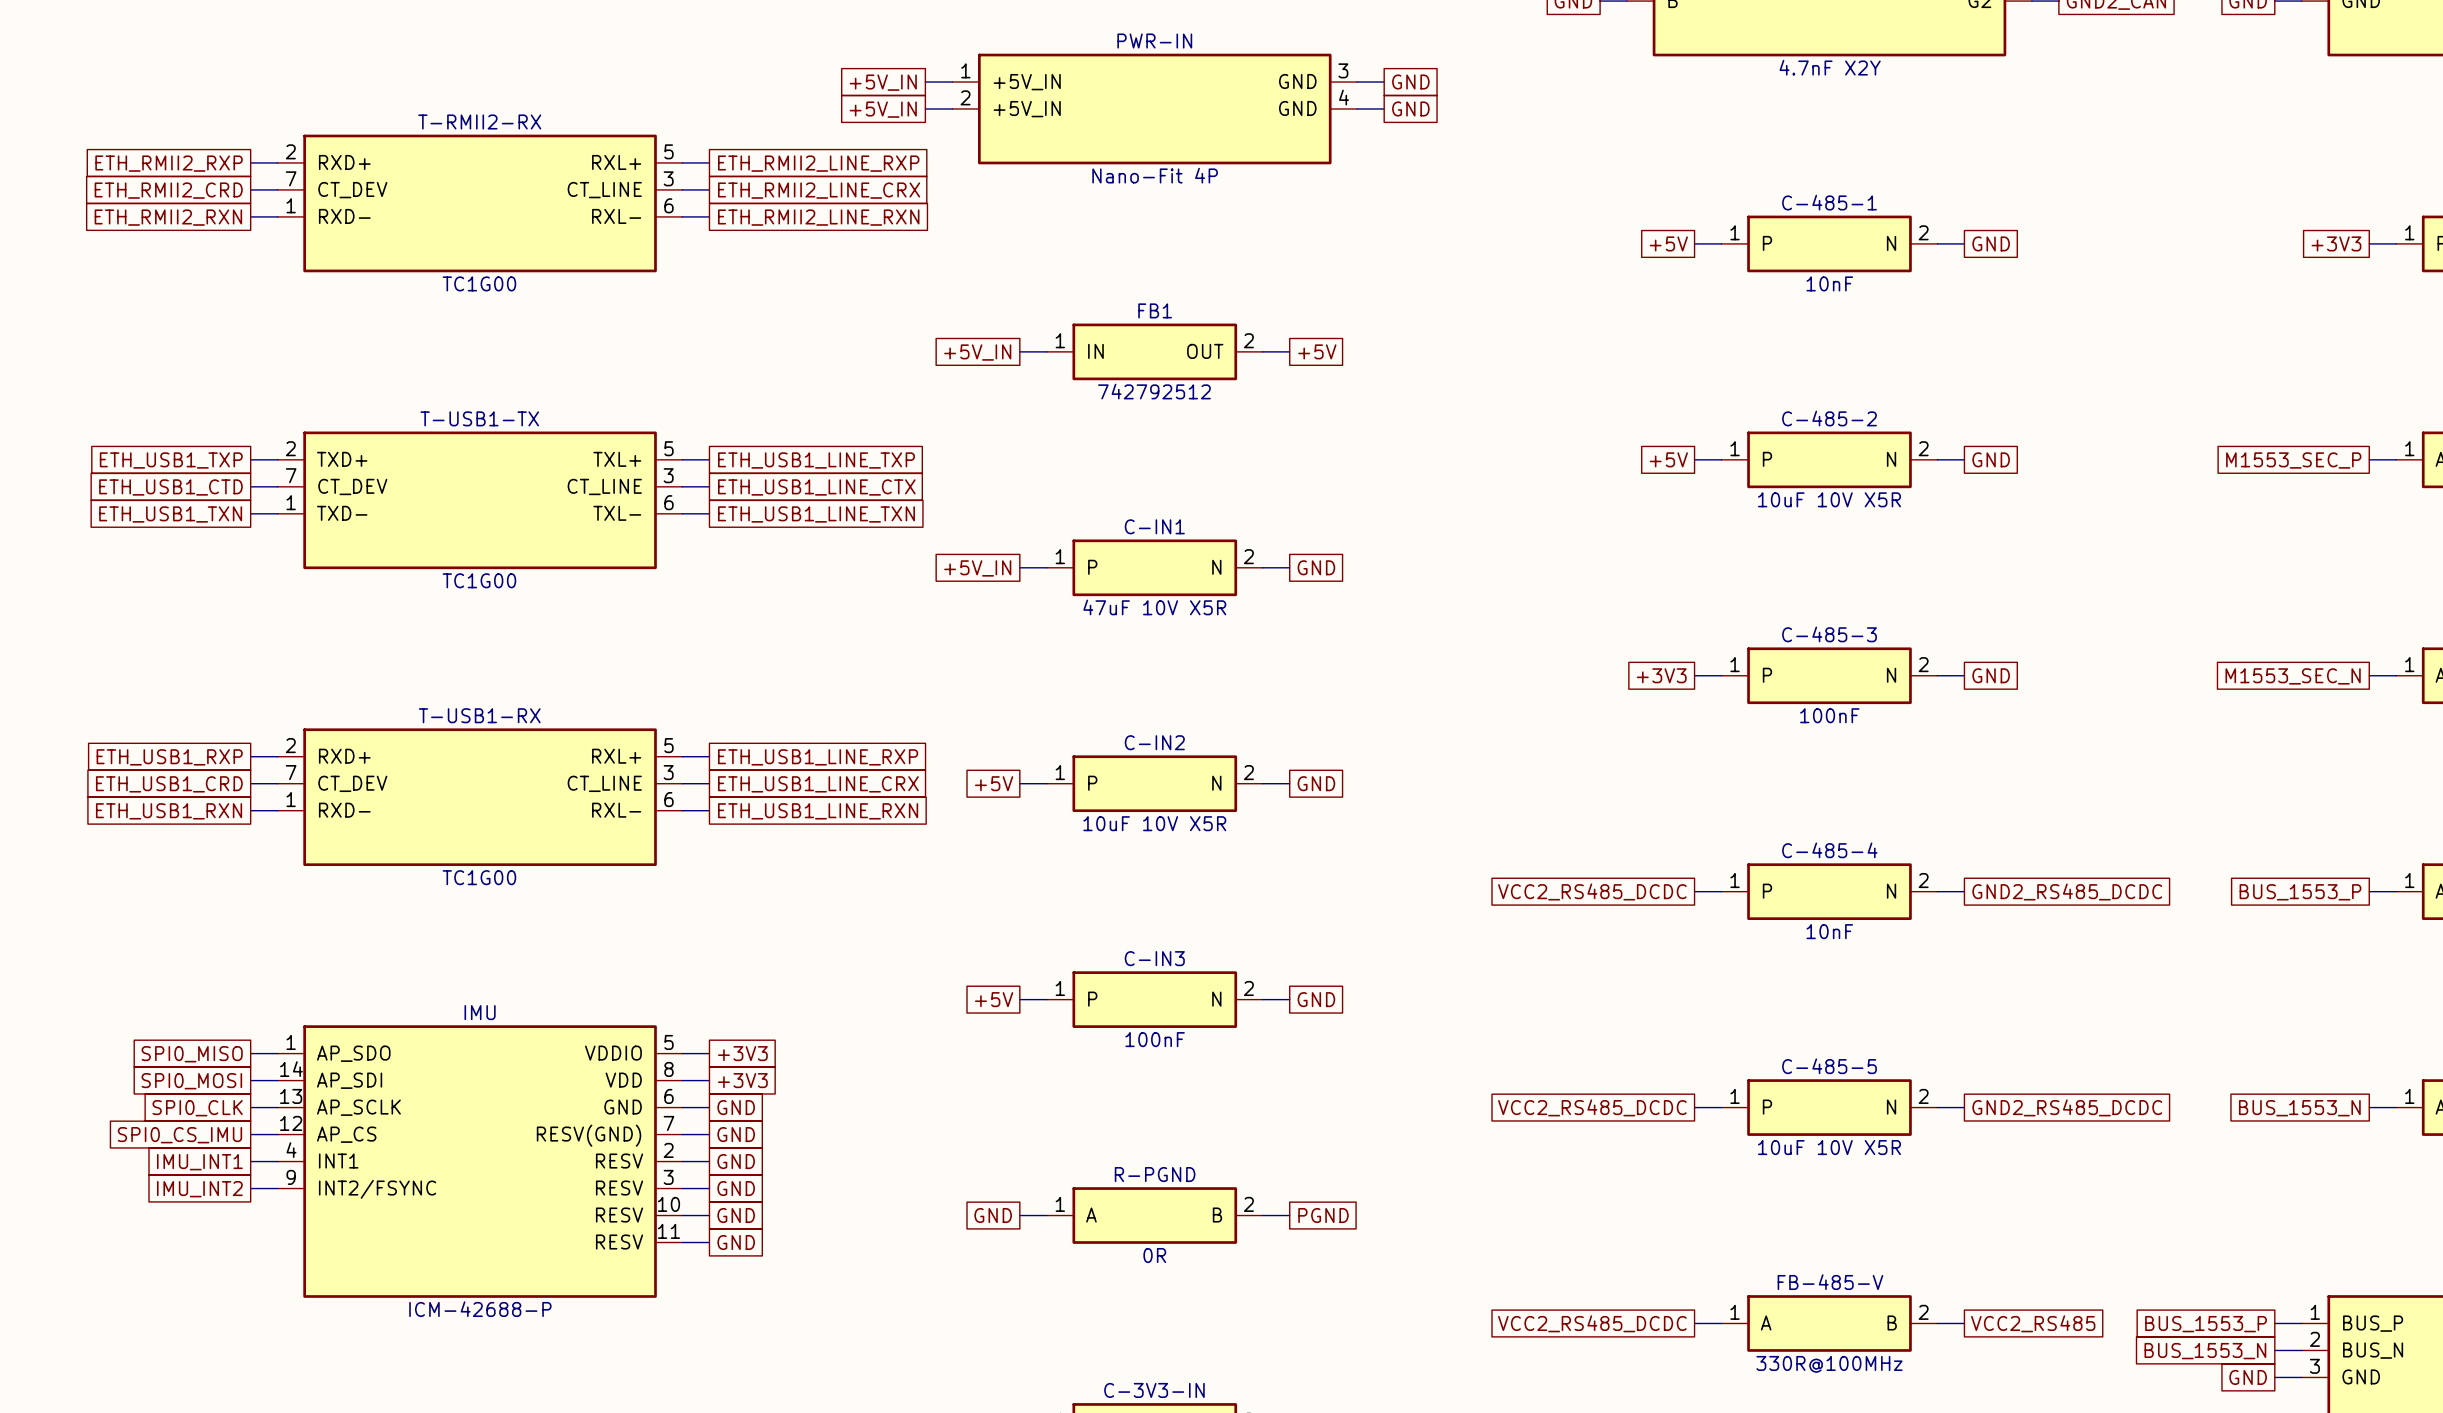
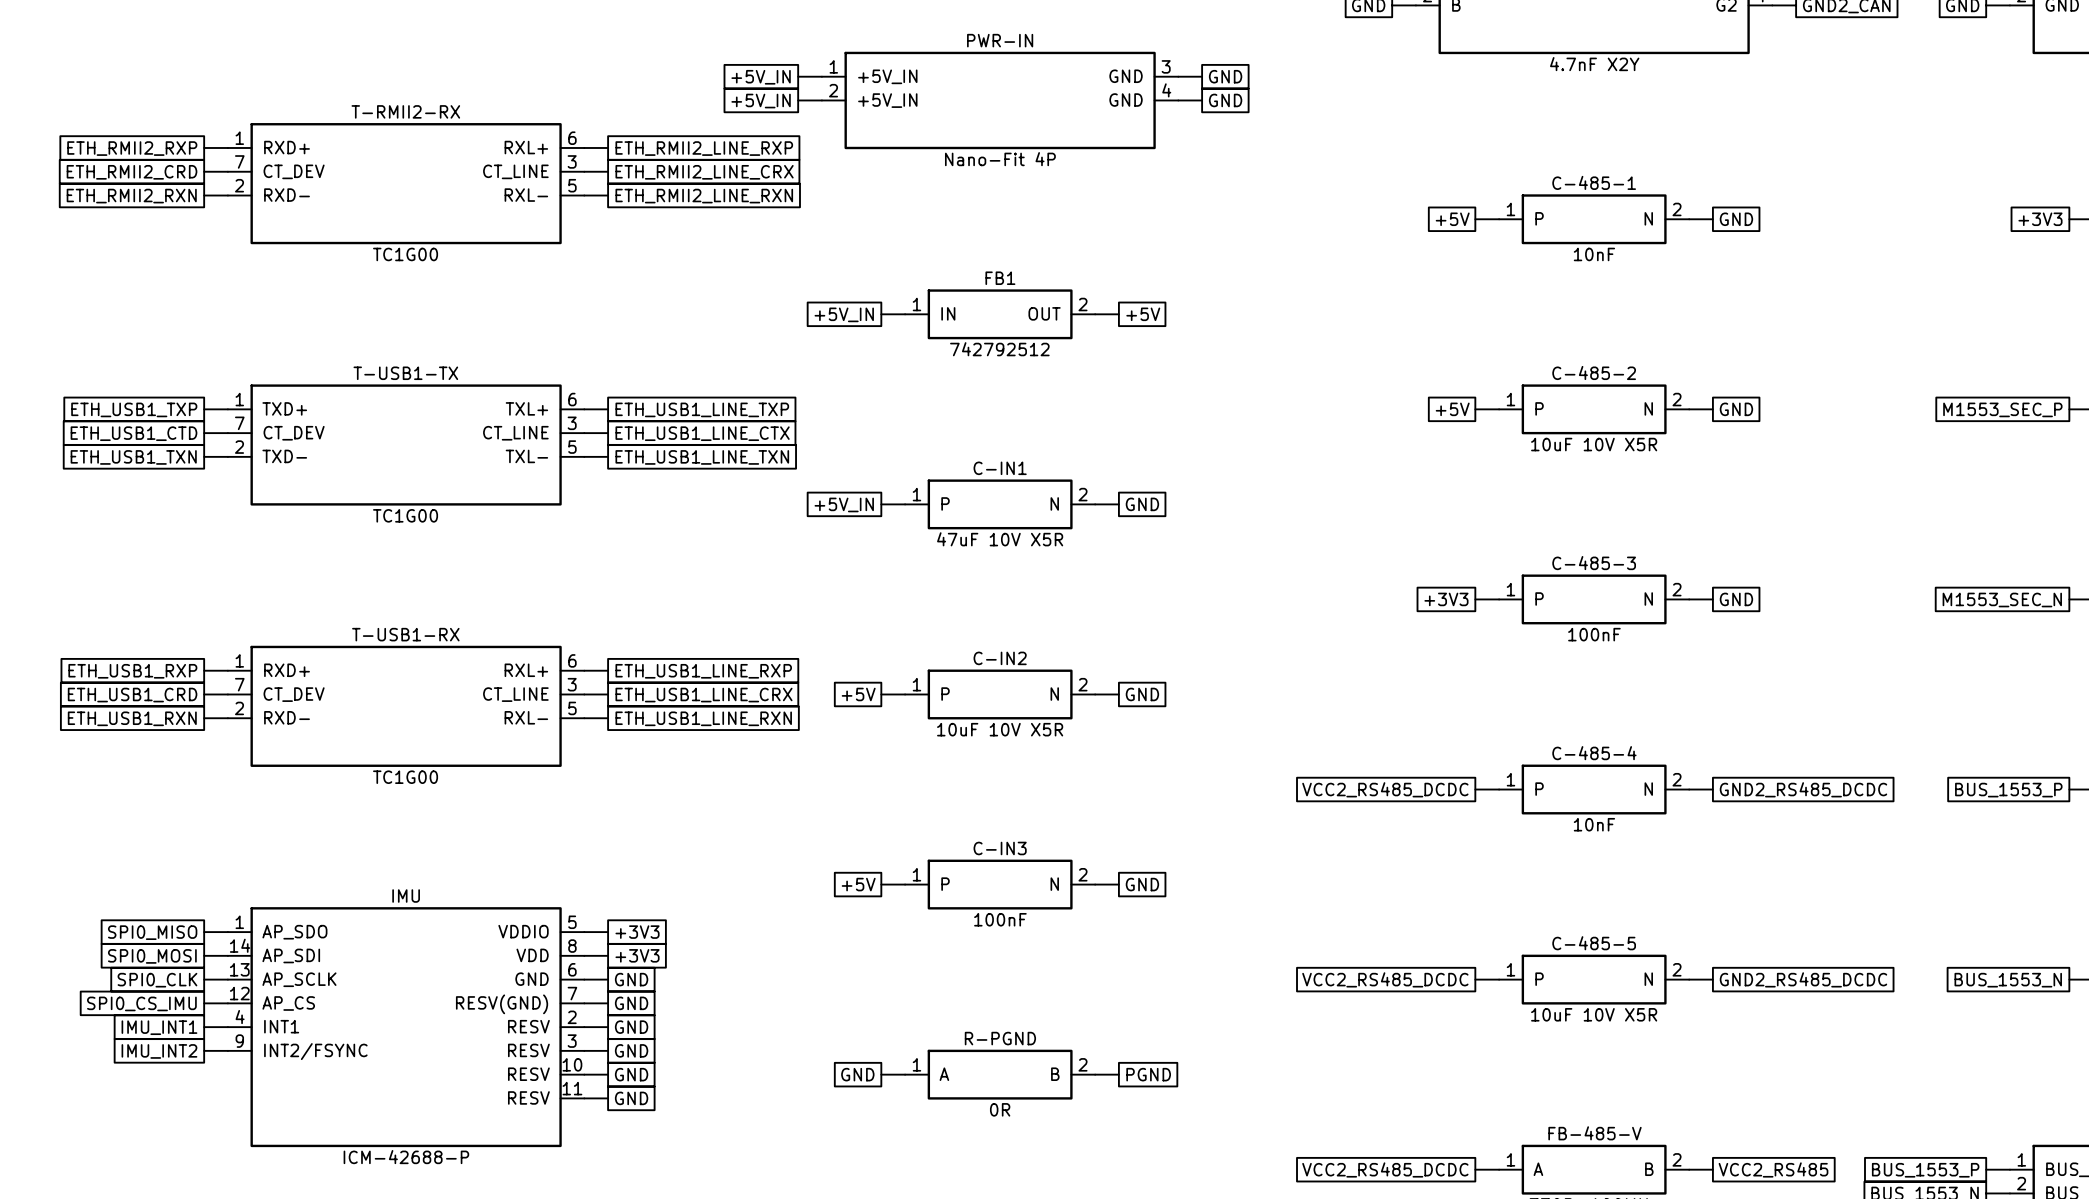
T-RMII2-RX pin number: 2 (290, 151) -> 1 (239, 138)
T-RMII2-RX pin number: 5 (668, 151) -> 6 (572, 138)
T-RMII2-RX pin number: 1 (291, 205) -> 2 (239, 185)
T-RMII2-RX pin number: 6 (668, 205) -> 5 (572, 185)
T-USB1-TX pin number: 2 (290, 448) -> 1 (239, 399)
T-USB1-TX pin number: 5 (668, 448) -> 6 (572, 399)
T-USB1-TX pin number: 1 (291, 502) -> 2 (239, 447)
T-USB1-TX pin number: 6 (668, 502) -> 5 (572, 447)
T-USB1-RX pin number: 2 (290, 745) -> 1 (239, 660)
T-USB1-RX pin number: 5 (668, 745) -> 6 (572, 660)
T-USB1-RX pin number: 1 (291, 799) -> 2 (239, 708)
T-USB1-RX pin number: 6 (668, 799) -> 5 (572, 708)

